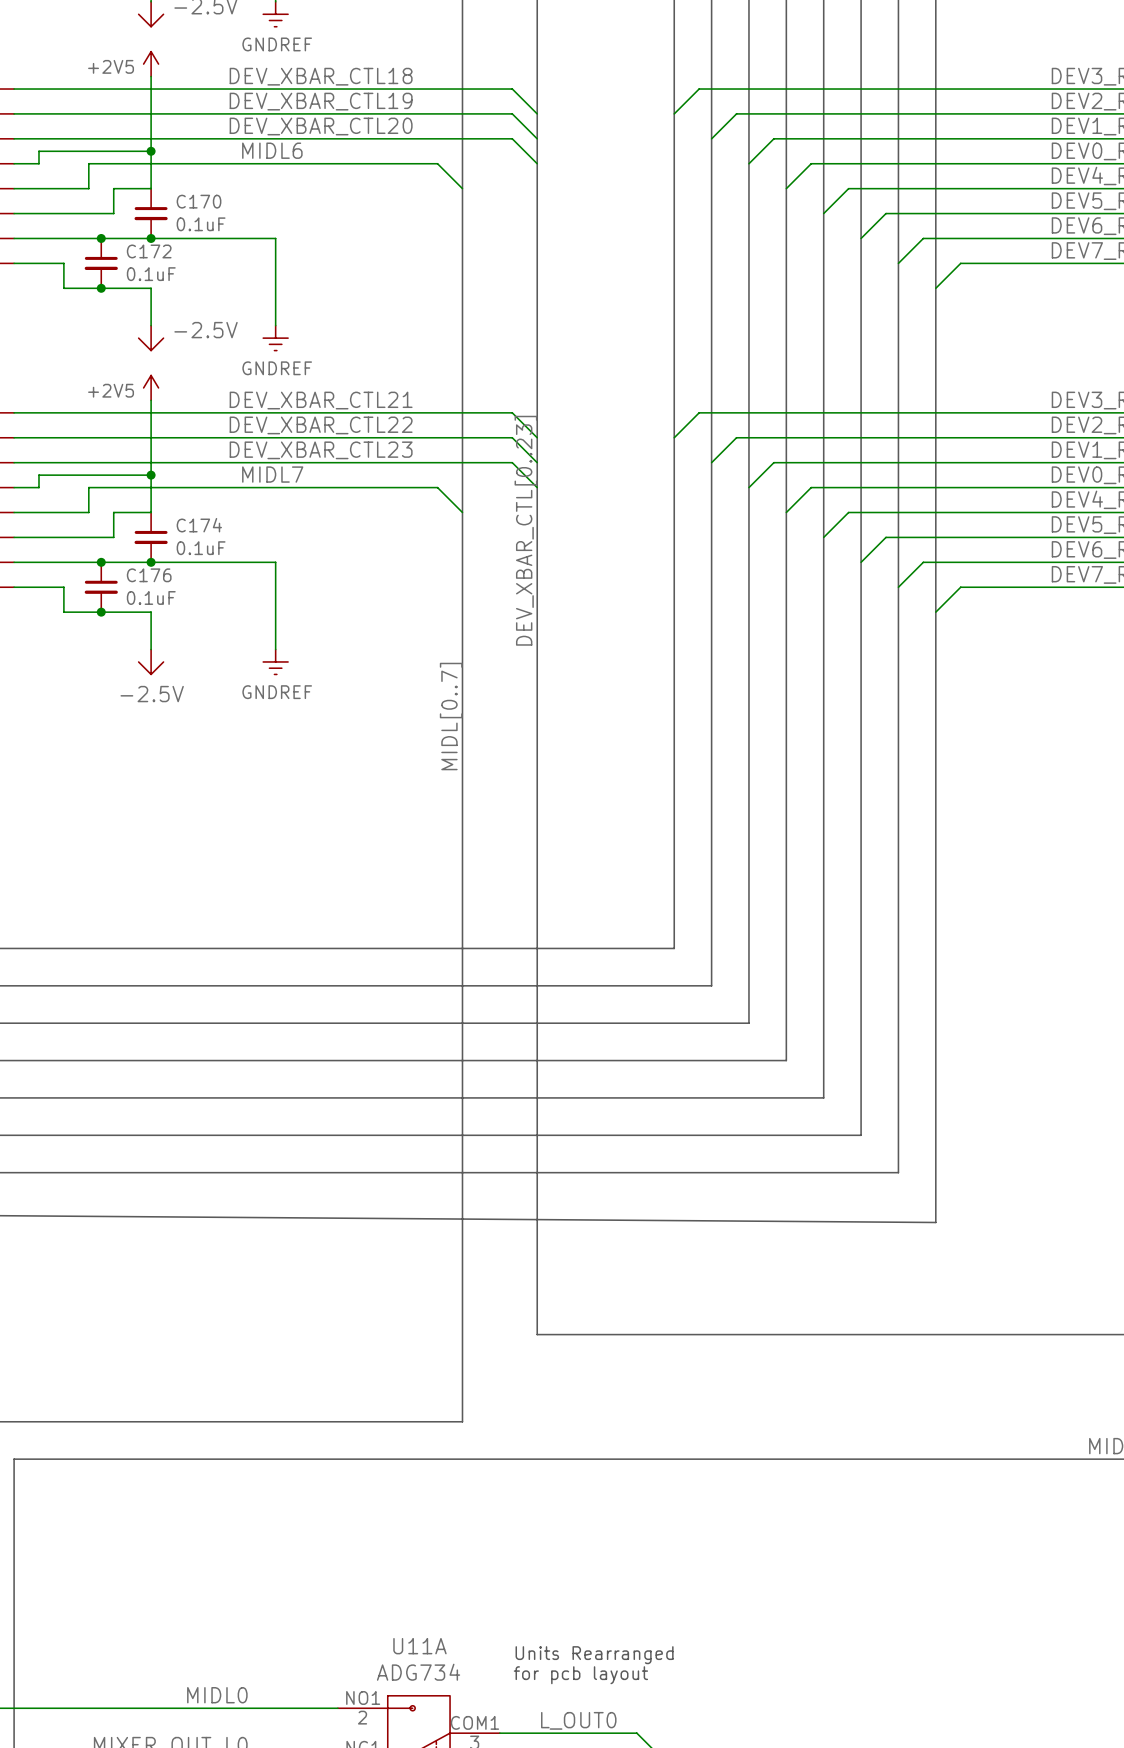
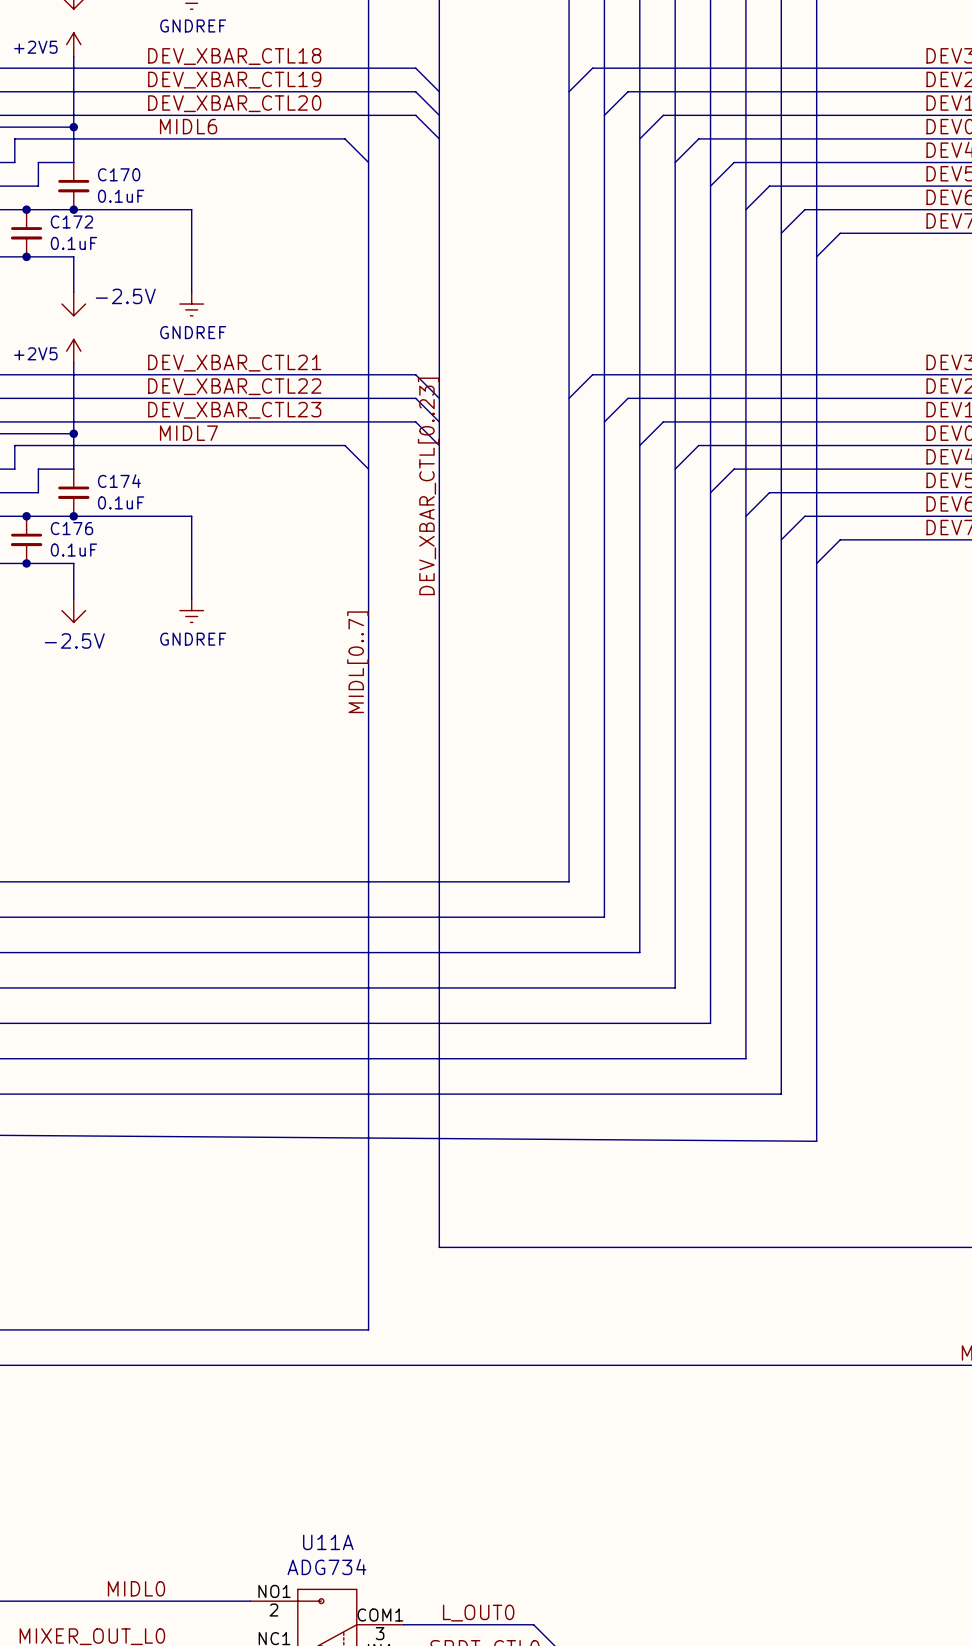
text: Units Rearranged (594, 1655) -> none
text: for pcb layout (580, 1675) -> none

